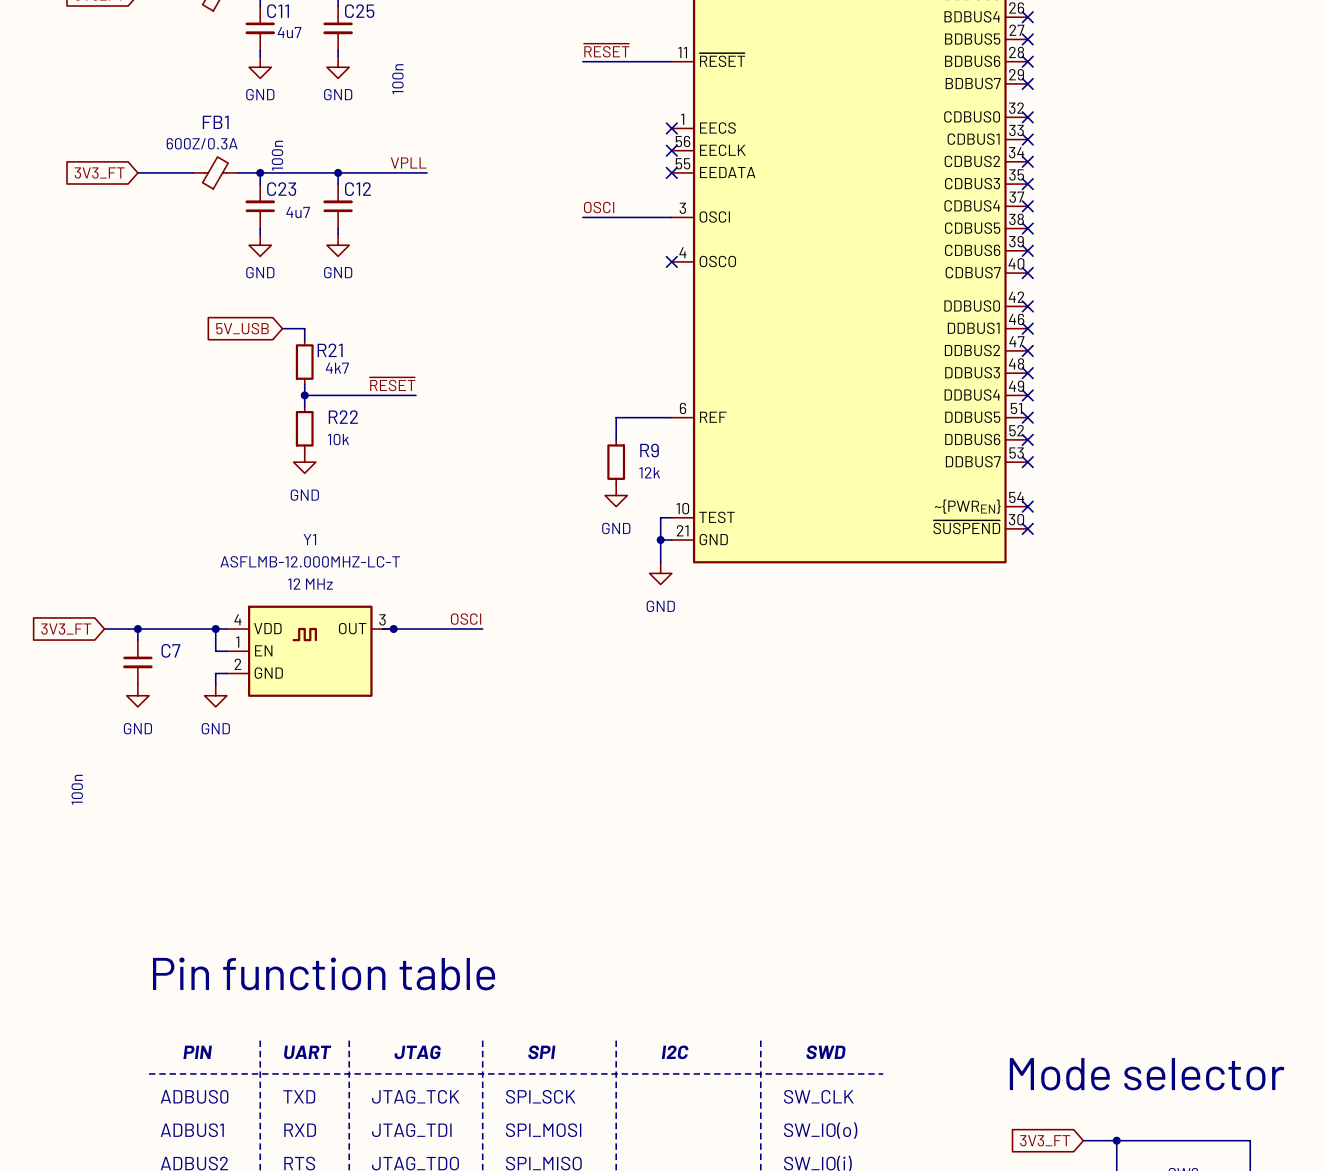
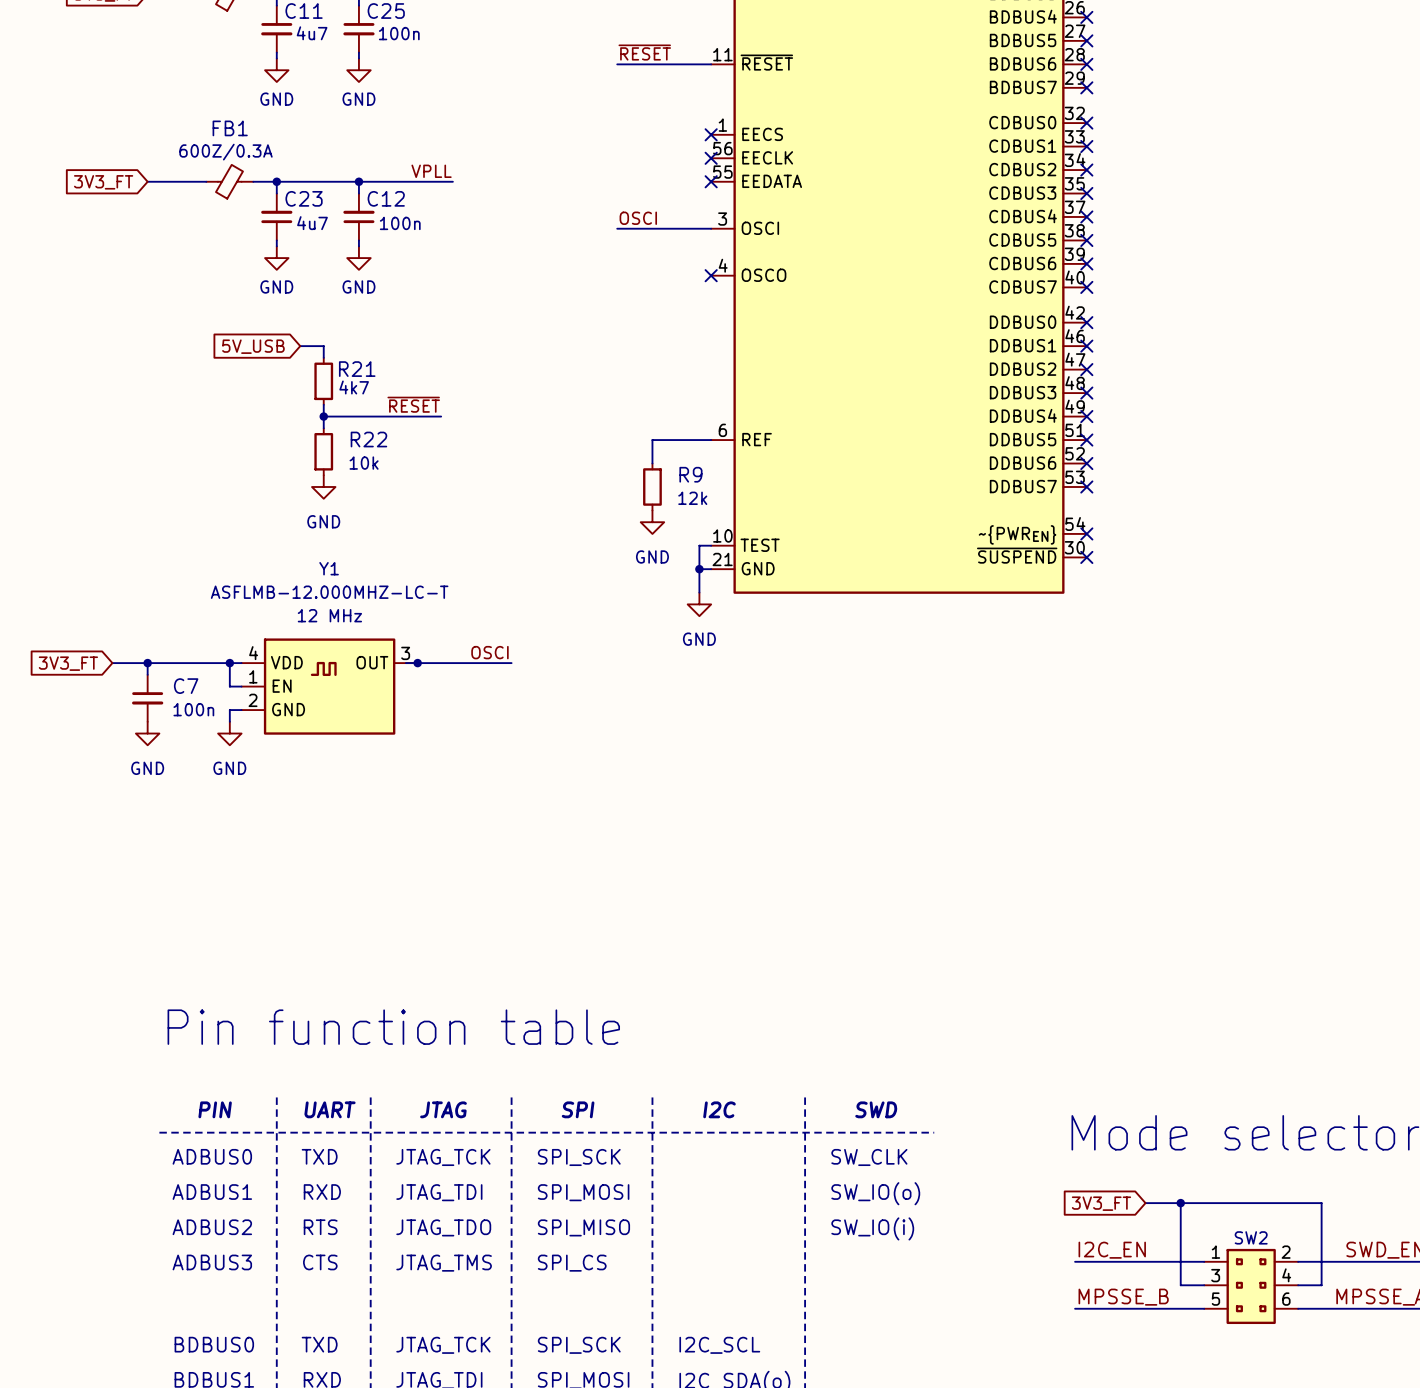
C12 text rotation: 0° (397, 79) -> 90° clockwise (400, 223)
C12 text position: 100n (397, 79) -> 100n (400, 223)
C25 text rotation: 0° (277, 155) -> 90° clockwise (399, 33)
C25 text position: 100n (277, 155) -> 100n (399, 33)
C7 text rotation: 0° (77, 789) -> 90° clockwise (193, 709)
C7 text position: 100n (77, 789) -> 100n (193, 709)

